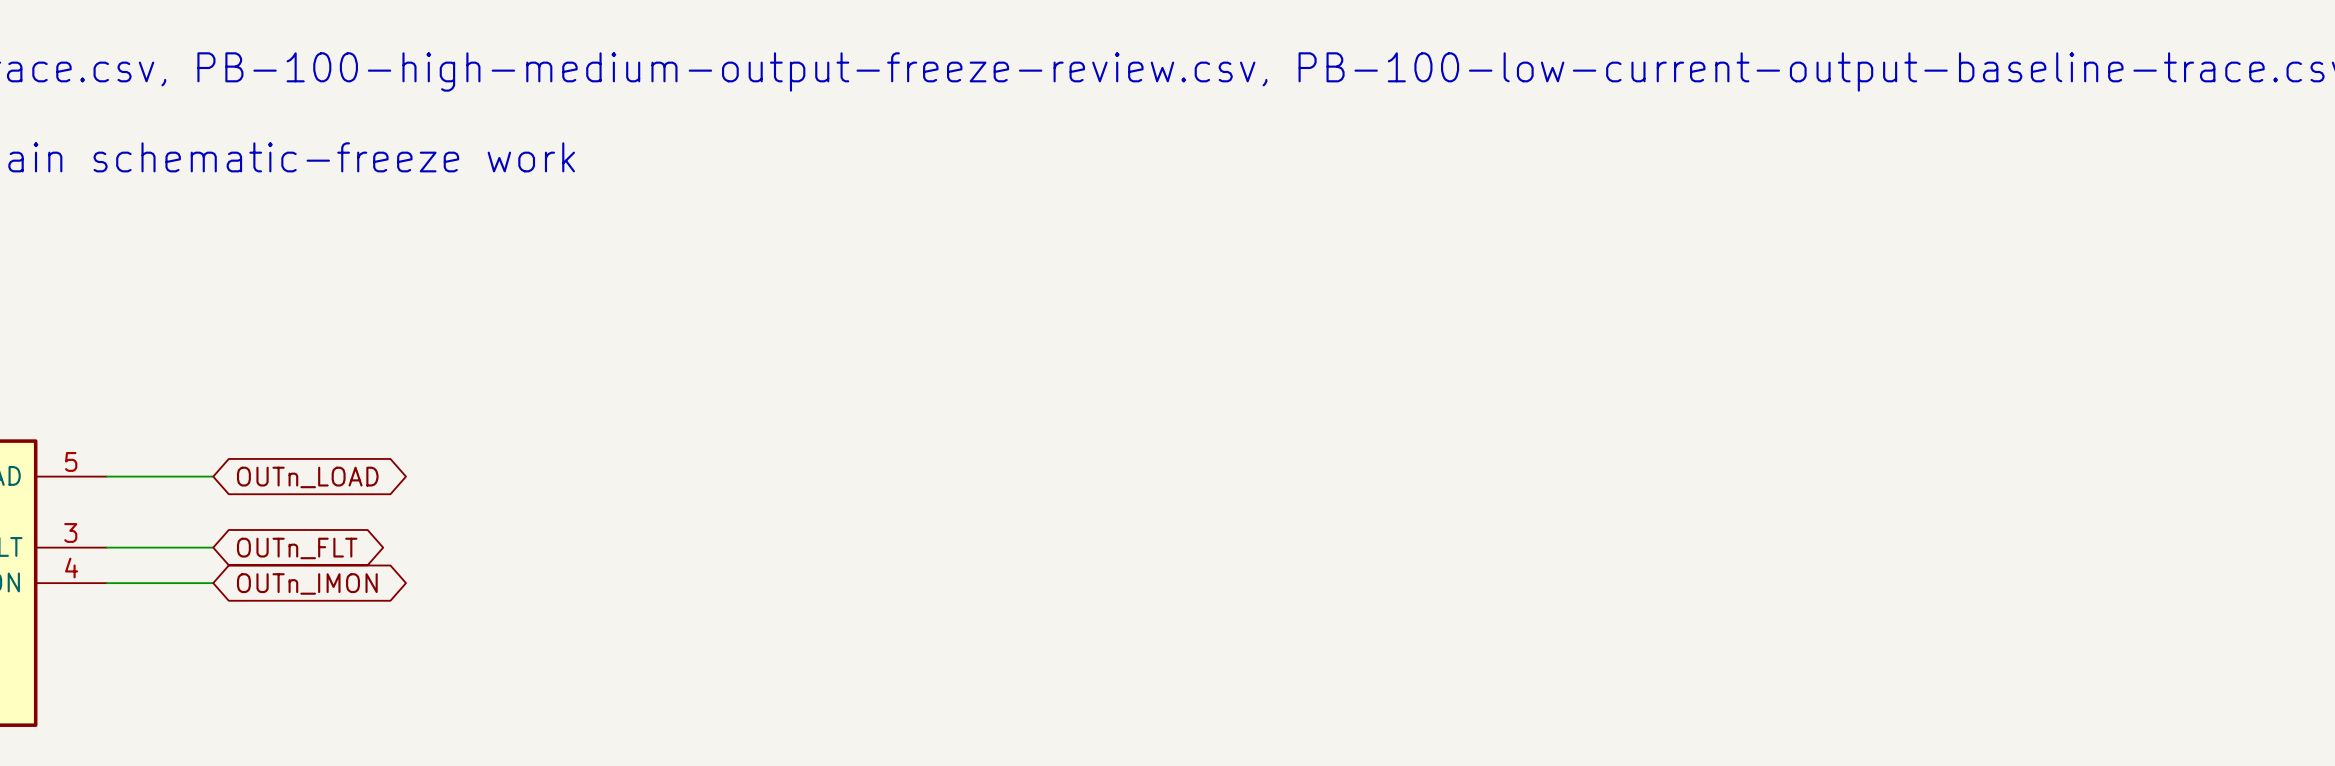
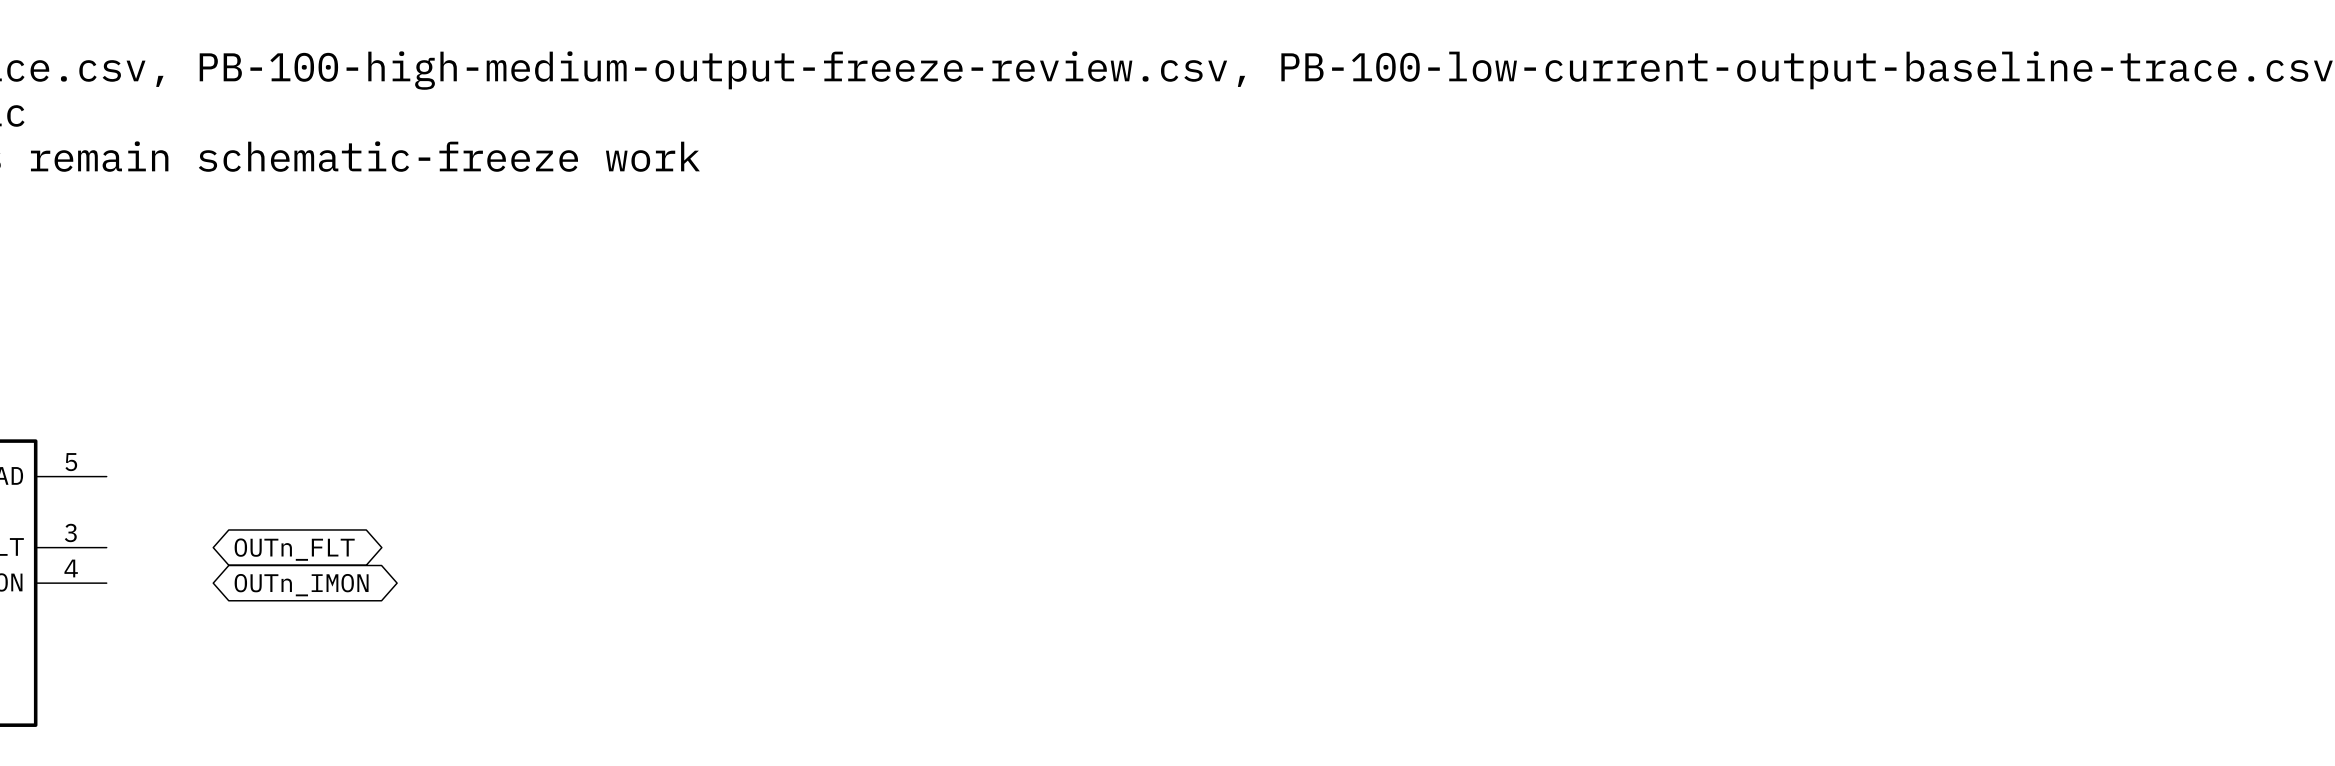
wire: (106, 476) (213, 476) -> none
global label: OUTn_LOAD (307, 477) -> none
wire: (106, 547) (213, 547) -> none
wire: (106, 583) (213, 583) -> none

